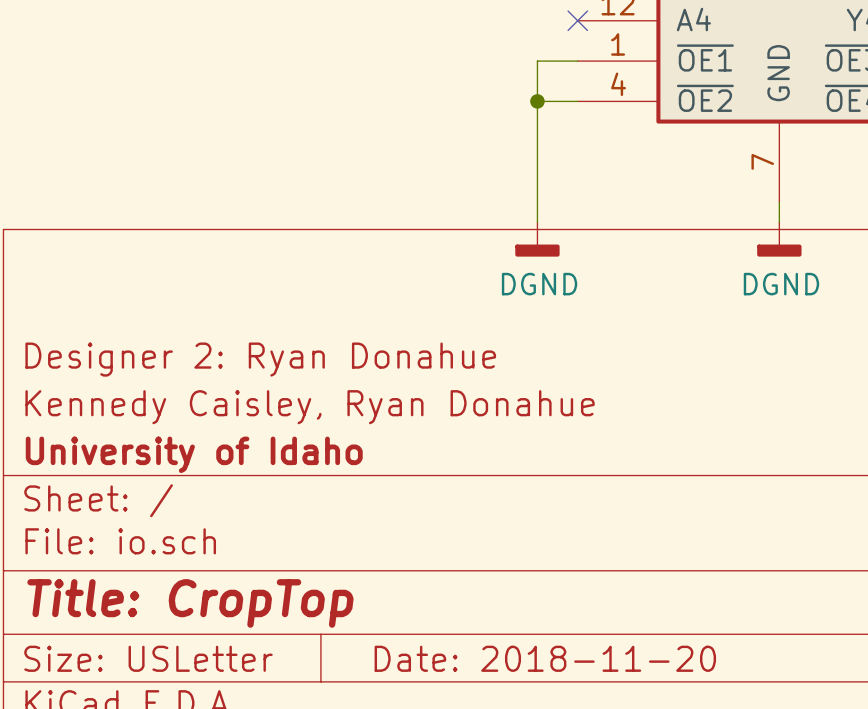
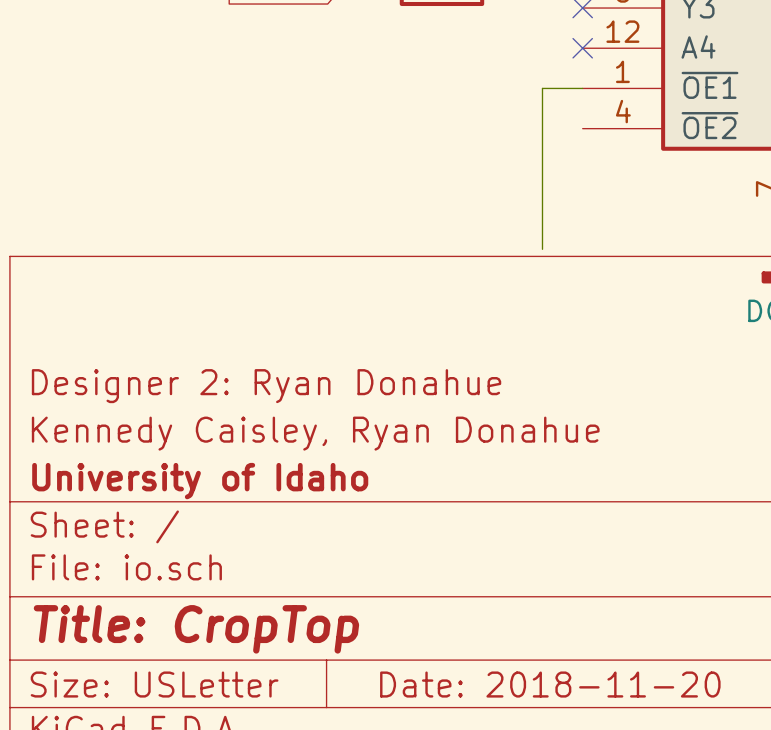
wire: (537, 101) (577, 101) -> none
junction: (537, 101) -> none
power symbol: DGND (537, 239) -> none

